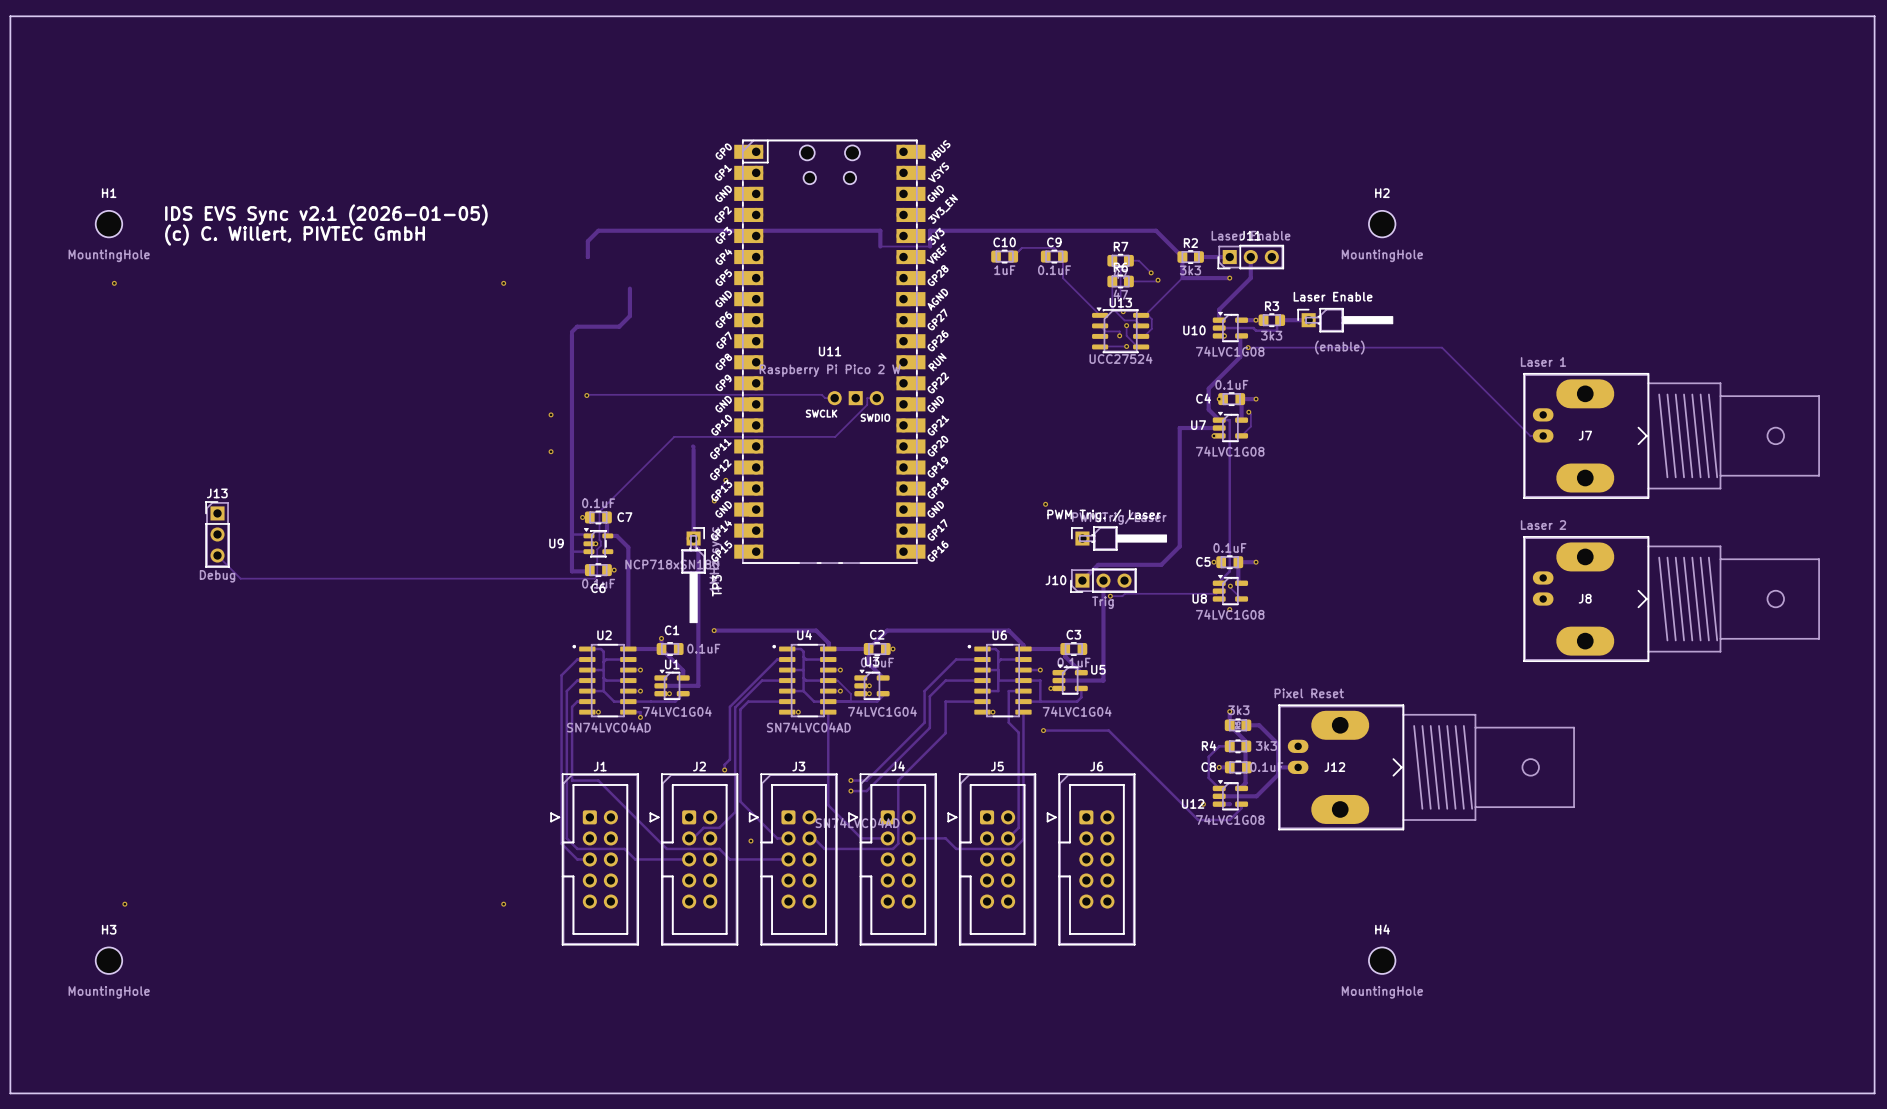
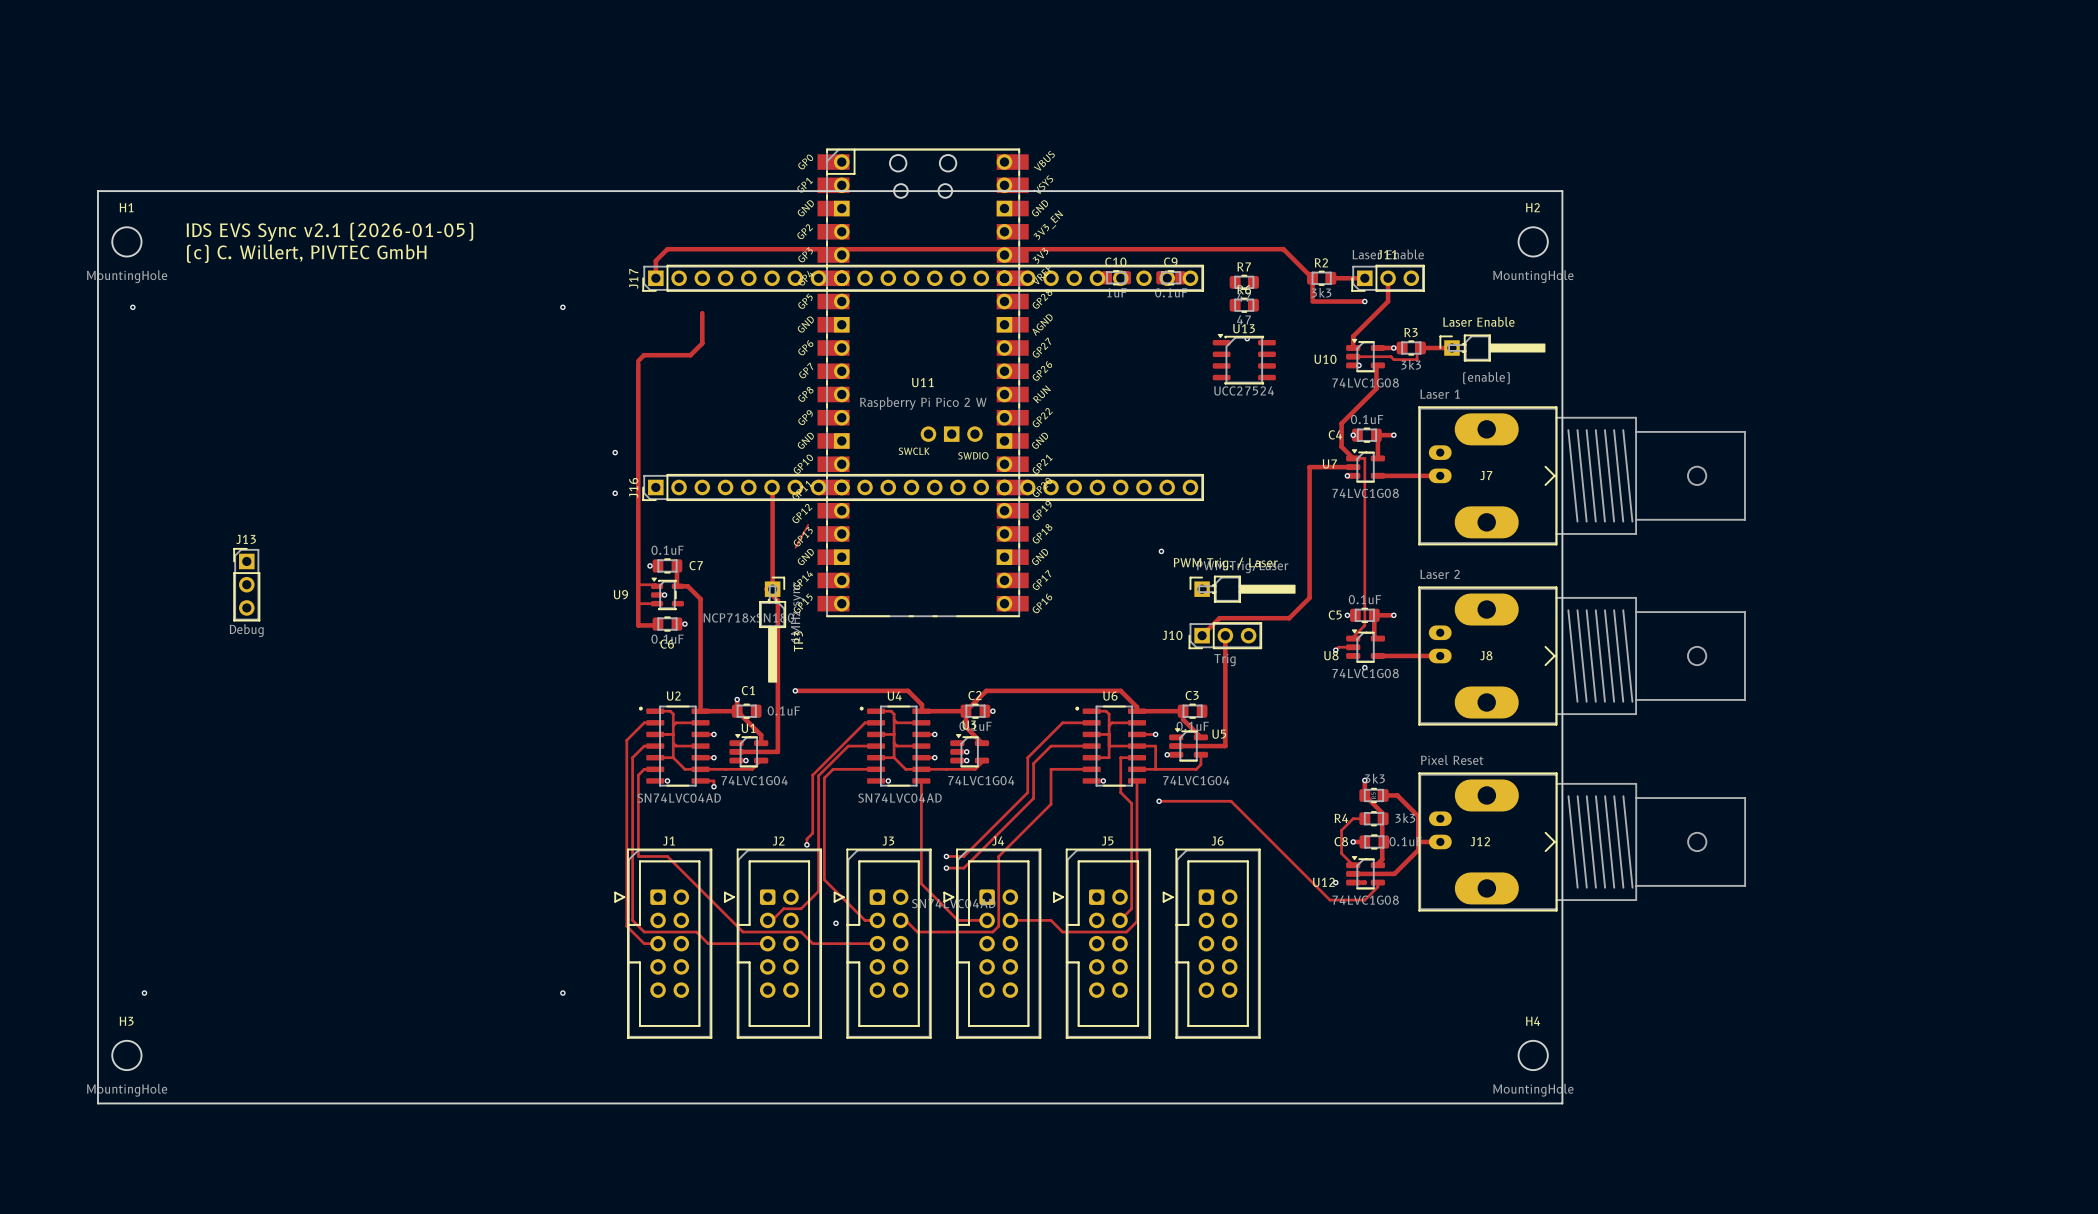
board edge: (10, 16) (1874, 16) (1874, 1093) (10, 1093) (10, 16) -> (97, 191) (97, 1103) (1562, 1103) (1562, 191) (97, 191)
track: (880, 230) (880, 246) (930, 246) (930, 230) -> (978, 249) (1033, 249)
track: (1013, 256) (1021, 247) (1054, 247) (1062, 256) (1062, 278) (1100, 315) -> none
J17: none -> (923, 278)
track: (1112, 260) (1120, 269) (1120, 309) (1123, 311) -> none
track: (1128, 260) (1139, 260) (1151, 272) -> none
via: (1151, 272) -> none
track: (1182, 275) (1182, 278) (1148, 312) (1148, 315) -> none
track: (1158, 280) (1128, 281) -> none
via: (1158, 280) -> none
track: (1112, 281) (1112, 308) (1124, 320) (1135, 320) (1141, 325) -> none
track: (1148, 315) (1151, 319) (1151, 328) (1144, 336) (1141, 336) -> none
track: (1100, 325) (1105, 331) (1119, 331) (1119, 335) -> none
track: (1126, 325) (1126, 335) (1137, 346) (1141, 346) -> none
via: (1126, 325) -> none
via: (1119, 335) -> none
track: (1126, 346) (1100, 346) -> none
via: (1126, 346) -> none
track: (1248, 347) (1442, 347) (1530, 435) (1543, 435) -> none
via: (1248, 347) -> none
track: (586, 395) (821, 394) (825, 398) (834, 398) -> none
via: (586, 395) -> none
track: (876, 398) (867, 398) (867, 404) (835, 436) (674, 436) (599, 511) (600, 545) (597, 549) (597, 576) (594, 578) (240, 578) (217, 555) -> none
track: (1248, 412) (1250, 414) (1250, 426) (1241, 435) -> (1440, 475) (1377, 475)
via: (1248, 412) -> none
J7 position: (1671, 435) -> (1582, 475)
J16: none -> (923, 487)
via: (725, 480) -> none
via: (714, 501) -> none
track: (1230, 586) (1241, 598) -> none
via position: (1230, 586) -> (1335, 650)
track: (1219, 591) (1216, 593) (1124, 593) (1122, 596) (1110, 596) -> (1353, 647) (1338, 647) (1335, 650)
via: (1110, 596) -> none
track: none -> (1376, 655) (1446, 655)
J8 position: (1671, 599) -> (1582, 656)
track: (828, 680) (837, 680) (850, 693) (850, 701) (828, 701) -> none

